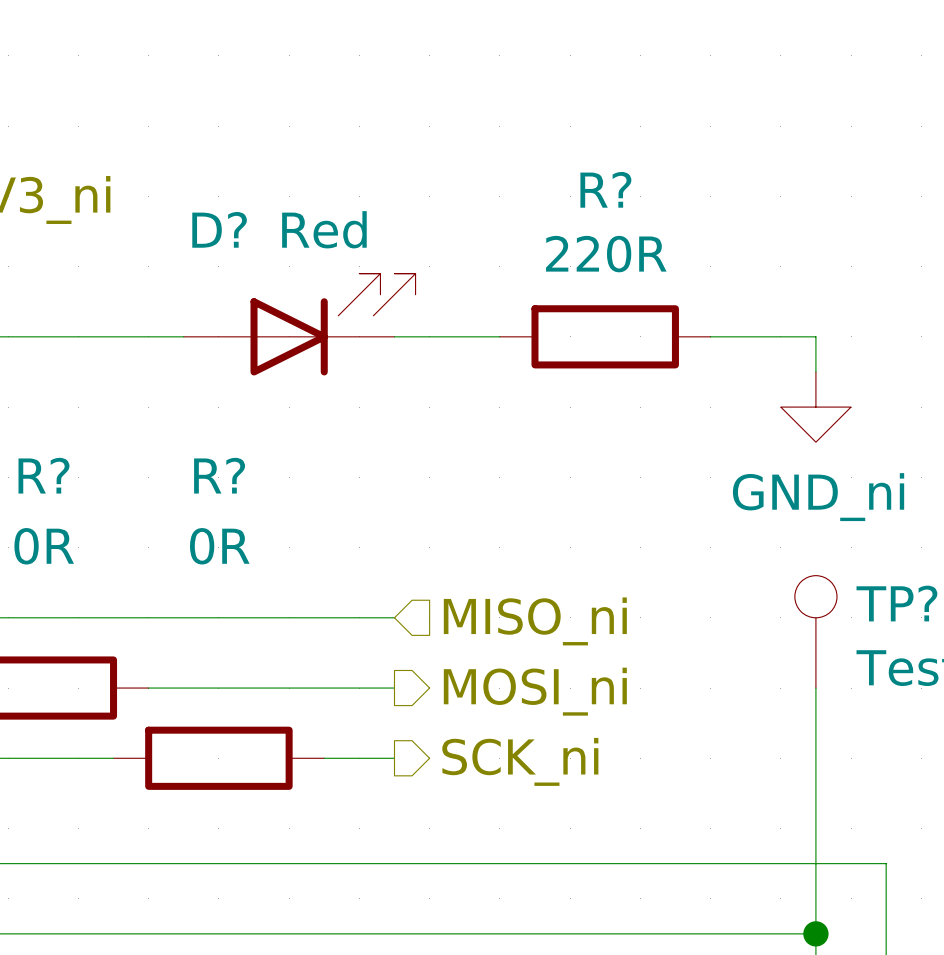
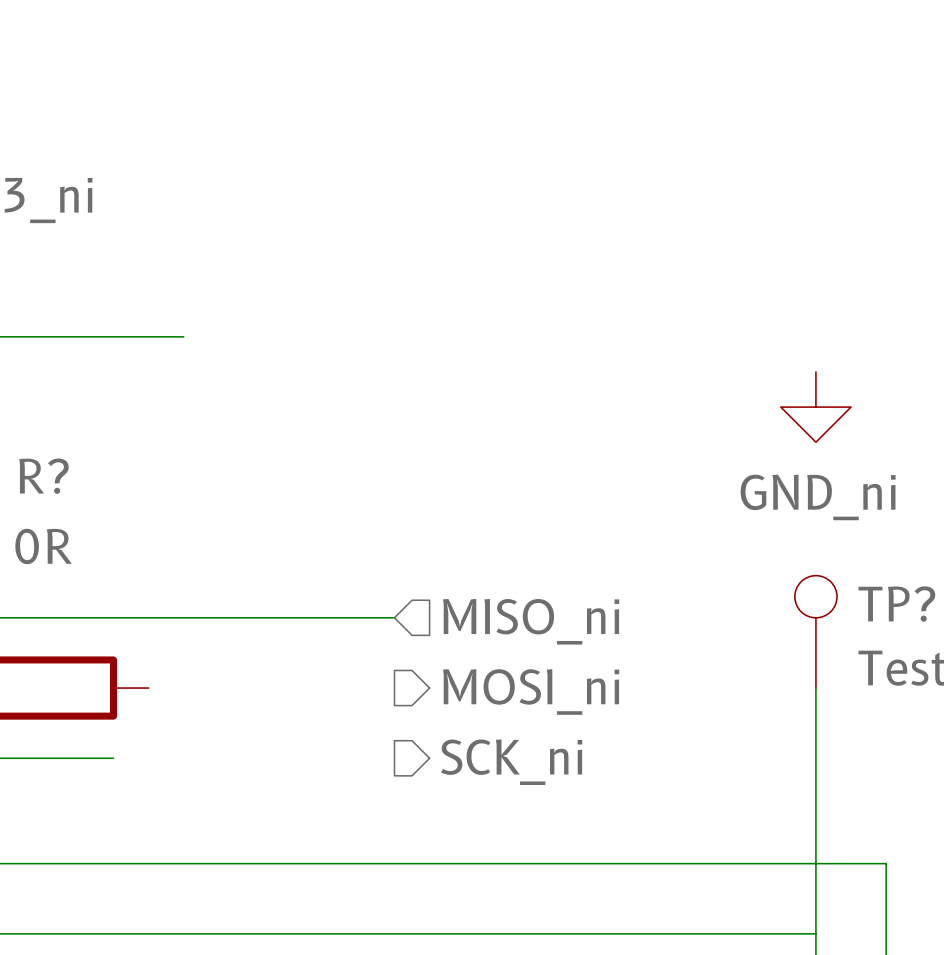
D?: Red (299, 324) -> none
wire: (394, 336) (499, 336) -> none
R?: 220R (605, 336) -> none
wire: (710, 336) (815, 336) (815, 371) -> none
wire: (148, 688) (394, 688) -> none
R?: 0R (218, 758) -> none
wire: (324, 758) (394, 758) -> none
junction: (815, 933) -> none

